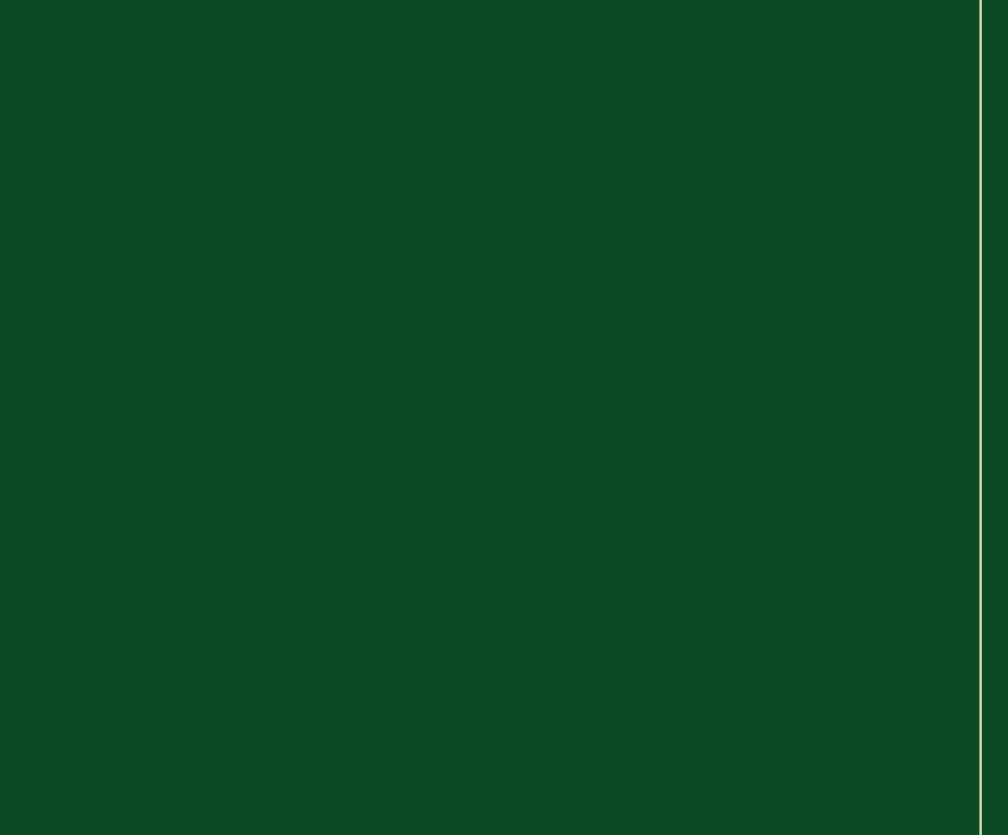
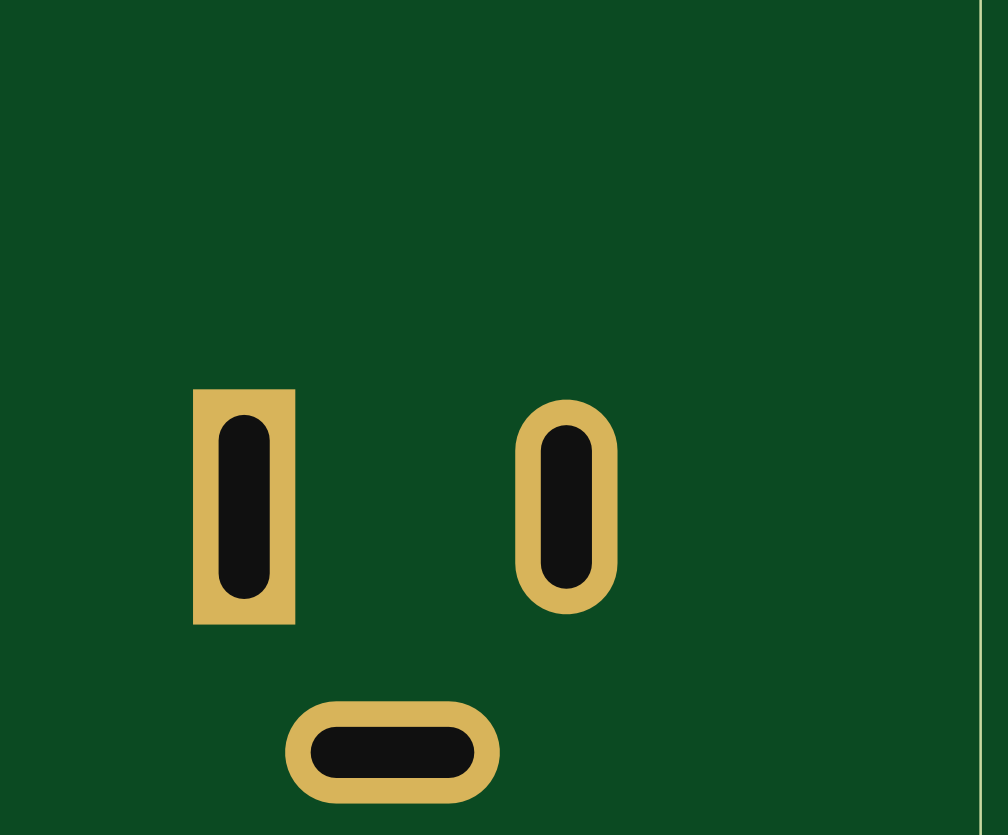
part: none -> (405, 596)

